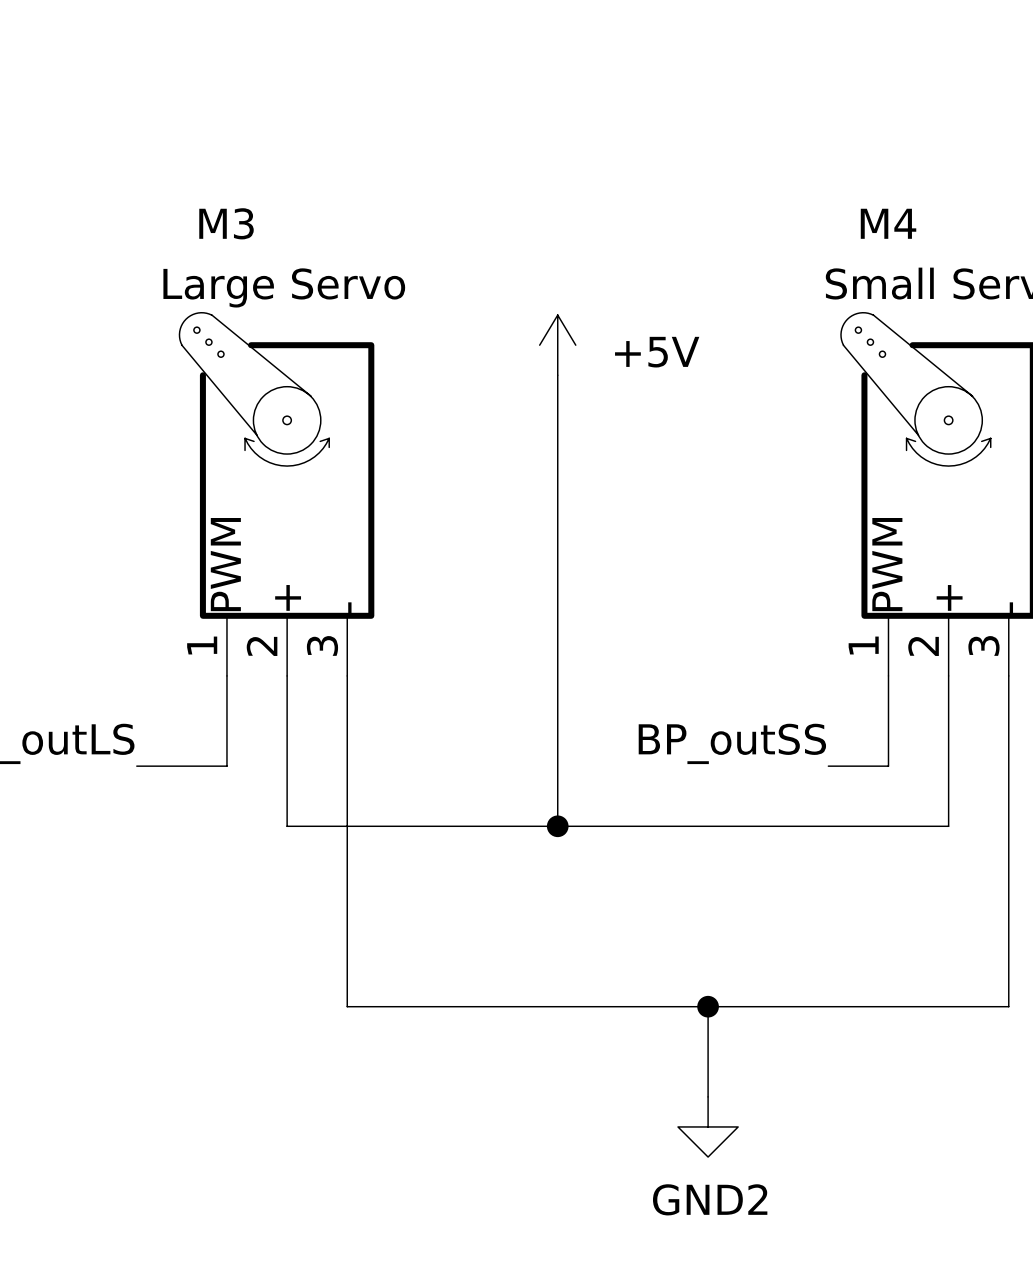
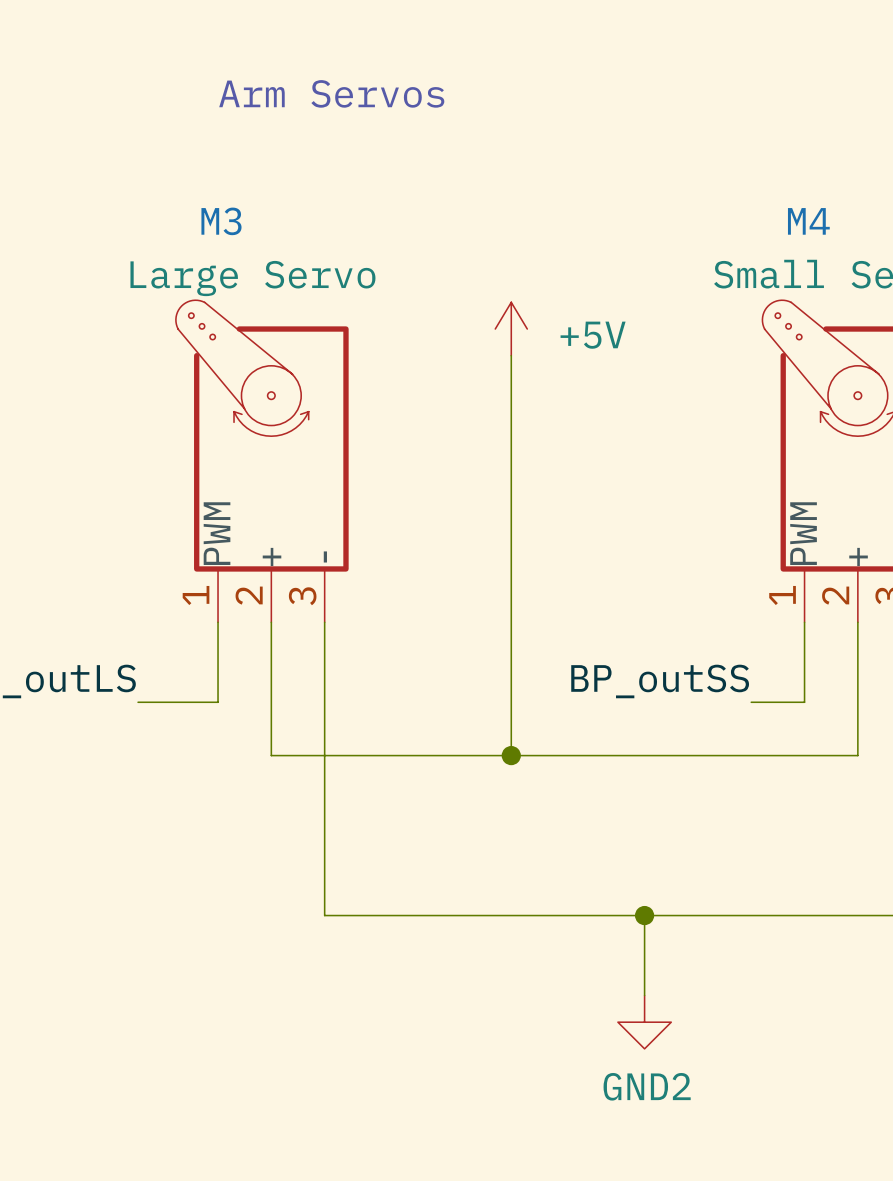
text: none -> Arm Servos (331, 93)

